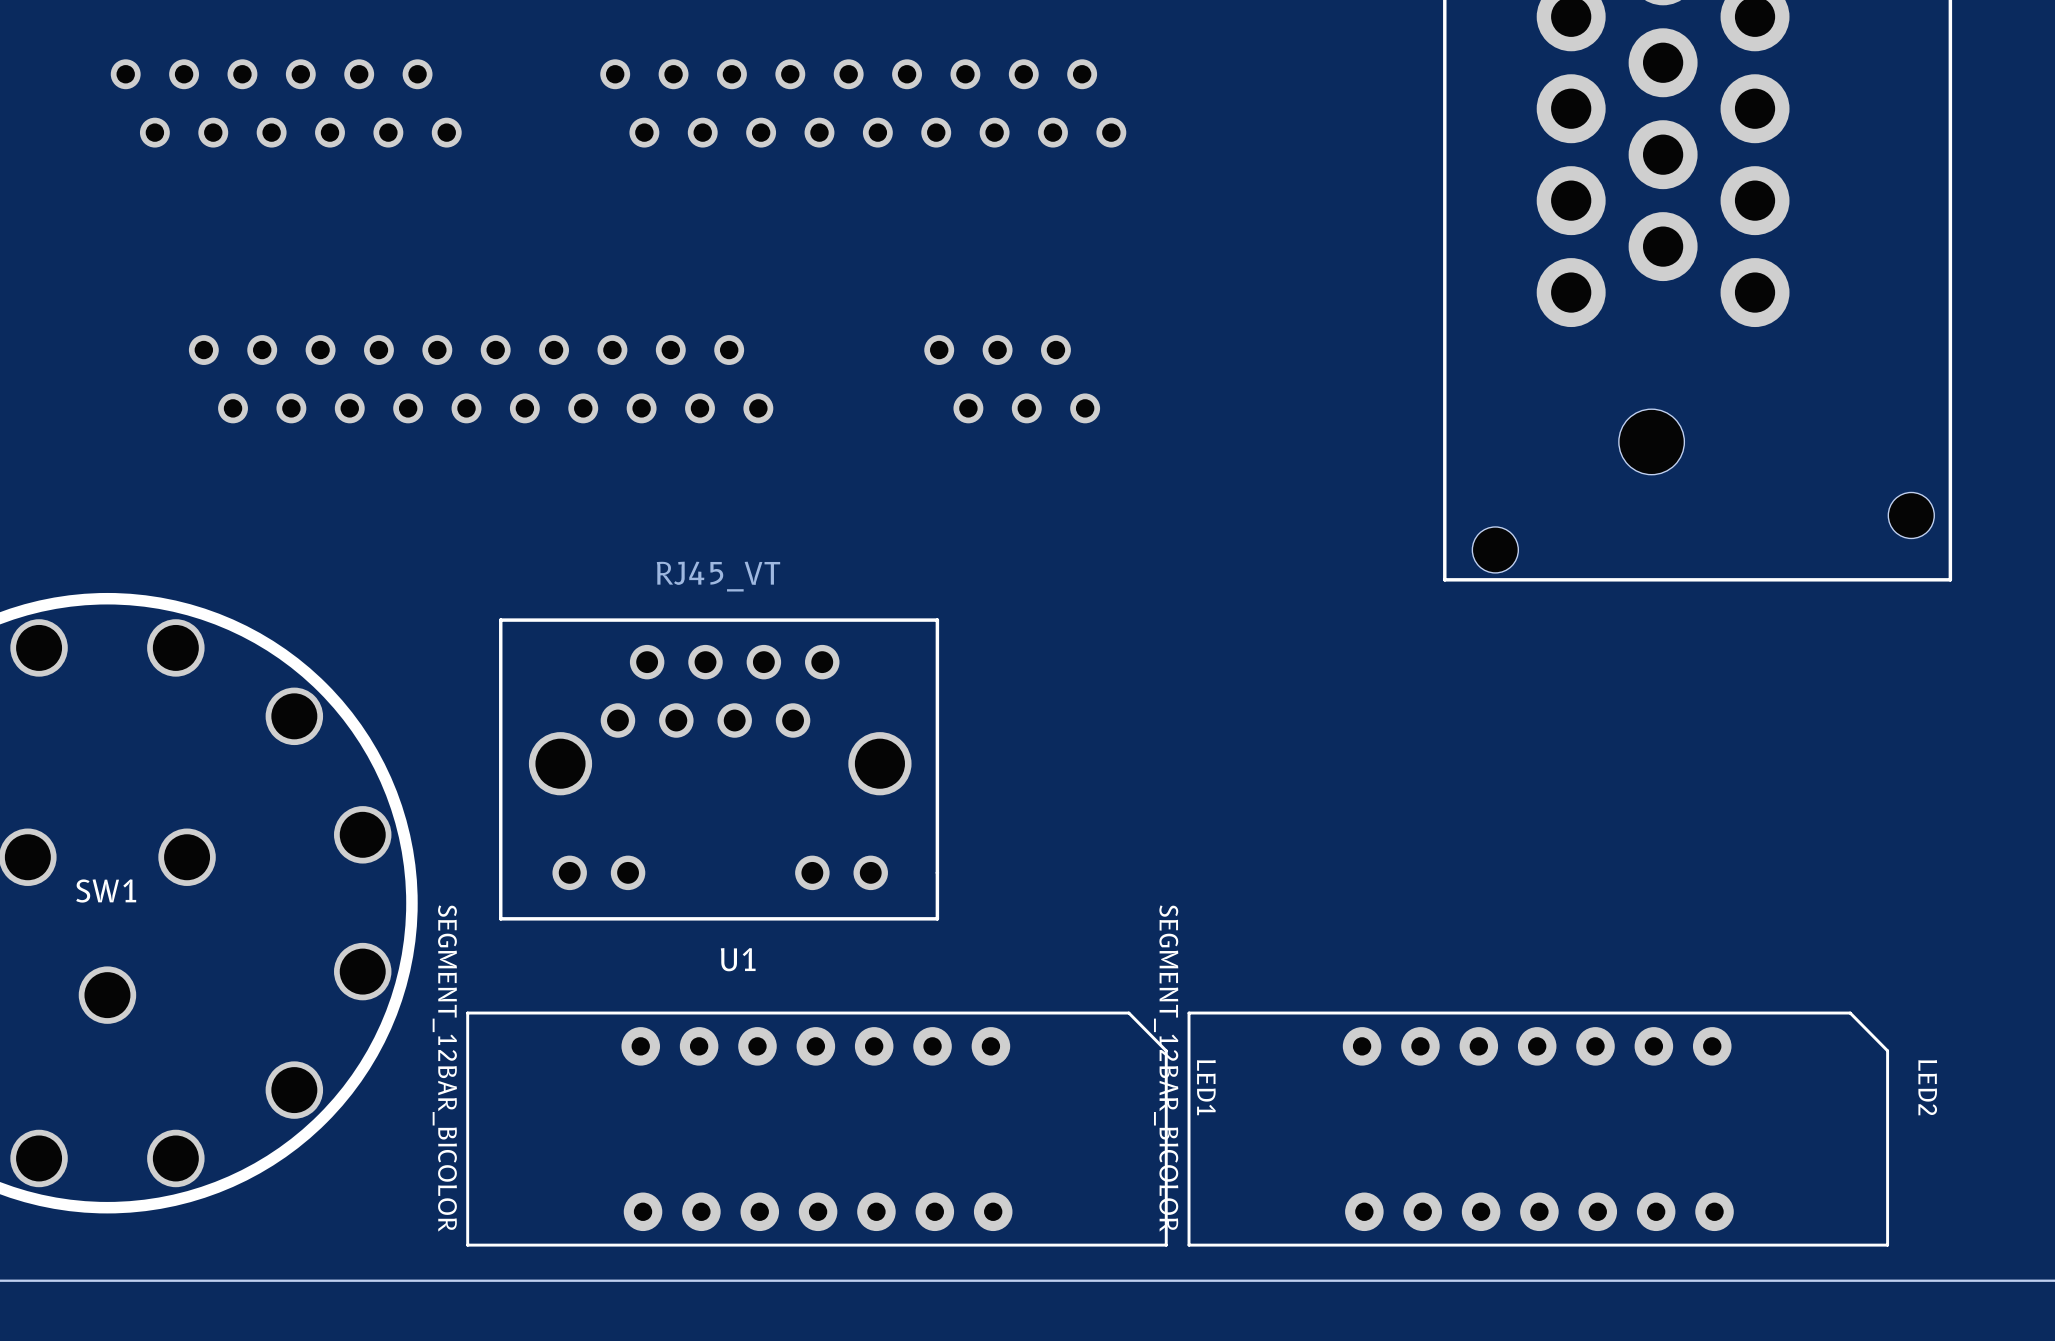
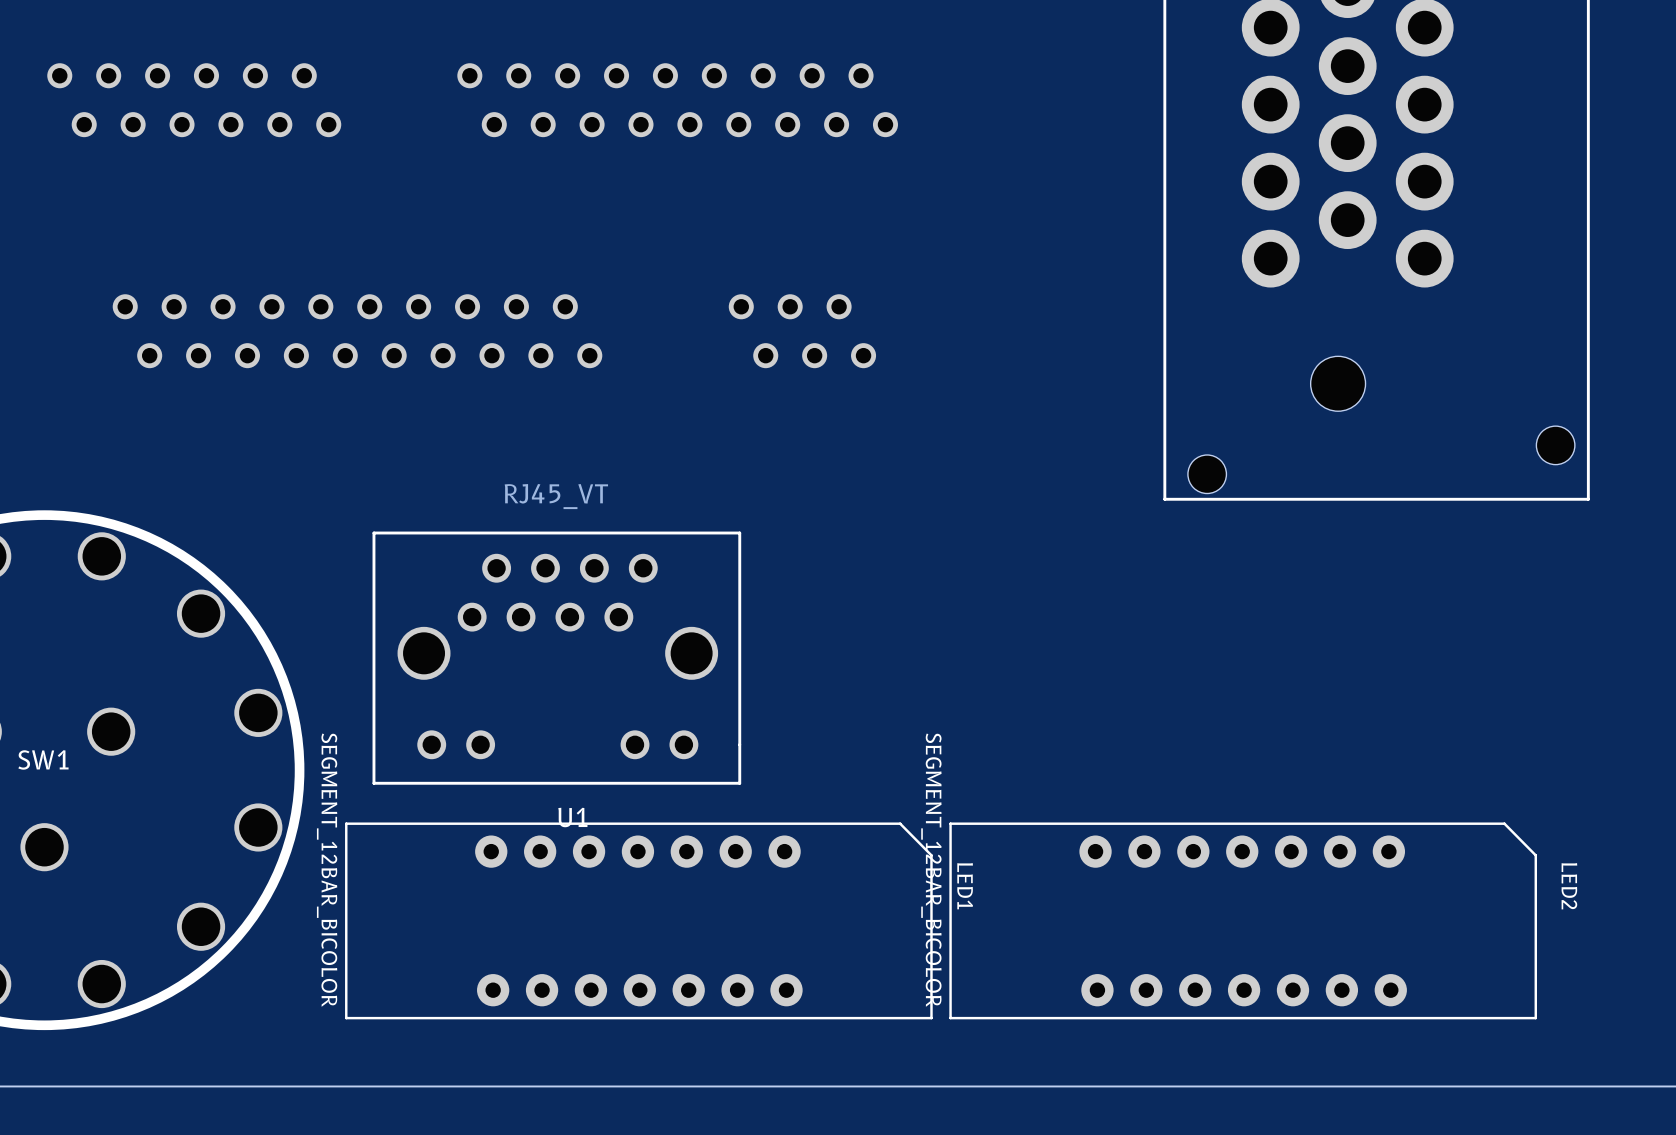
LED1 position: (816, 1129) -> (638, 920)
LED2 position: (1538, 1129) -> (1243, 920)

